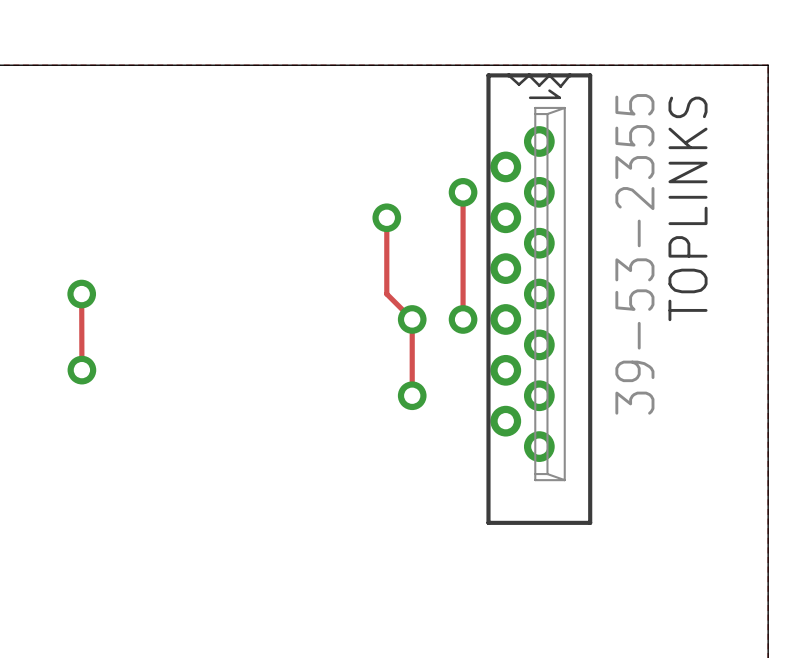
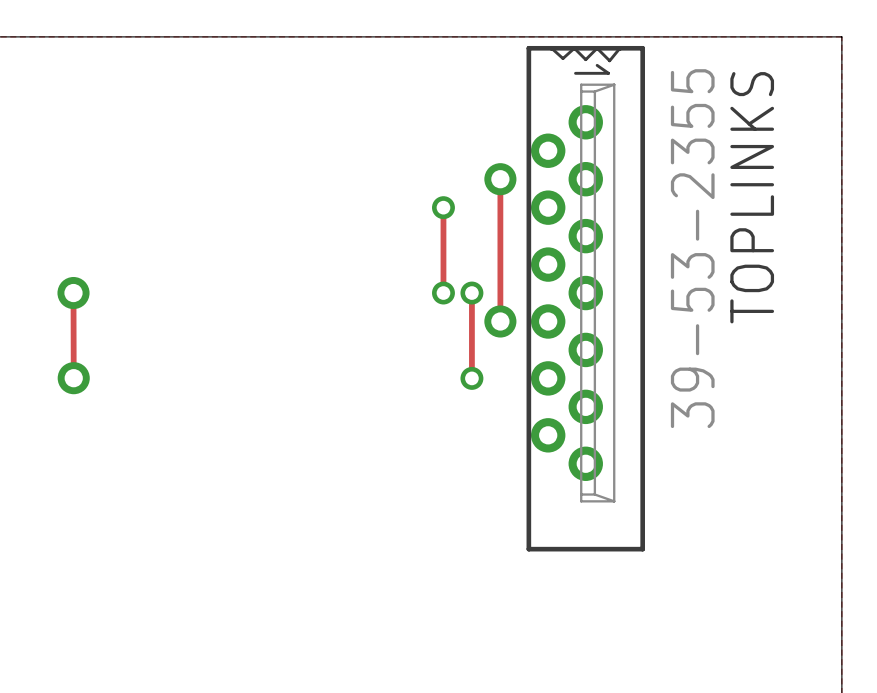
track: (386, 217) (386, 294) (412, 319) (412, 395) -> none
via: (386, 217) -> none
track: none -> (443, 207) (443, 293)
via: none -> (443, 207)
via: none -> (443, 293)
track: none -> (471, 293) (471, 378)
via: none -> (471, 293)
via: (412, 319) -> none
via: none -> (471, 378)
via: (412, 395) -> none

